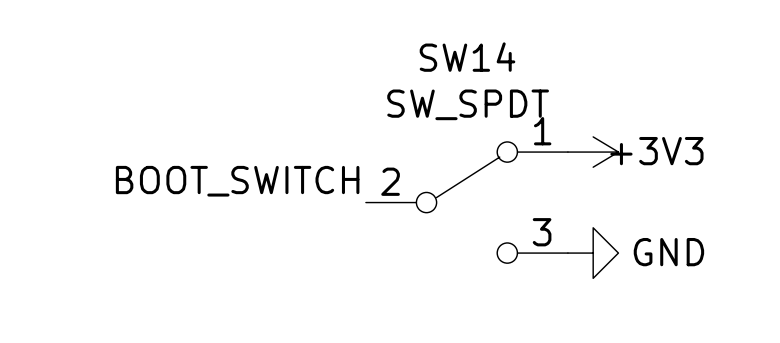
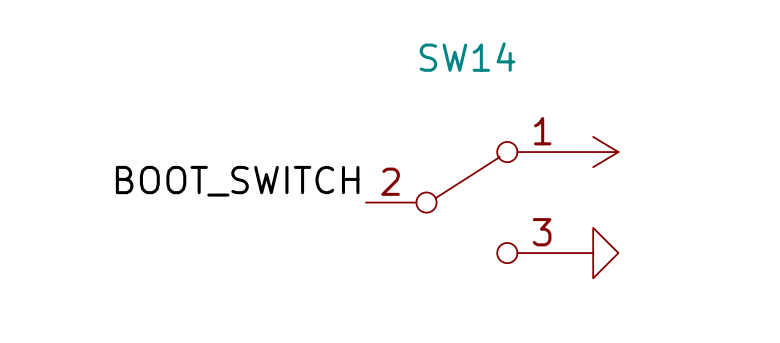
SW14 value: SW_SPDT (468, 104) -> none
power symbol text: +3V3 (656, 151) -> none
power symbol text: GND (668, 252) -> none

